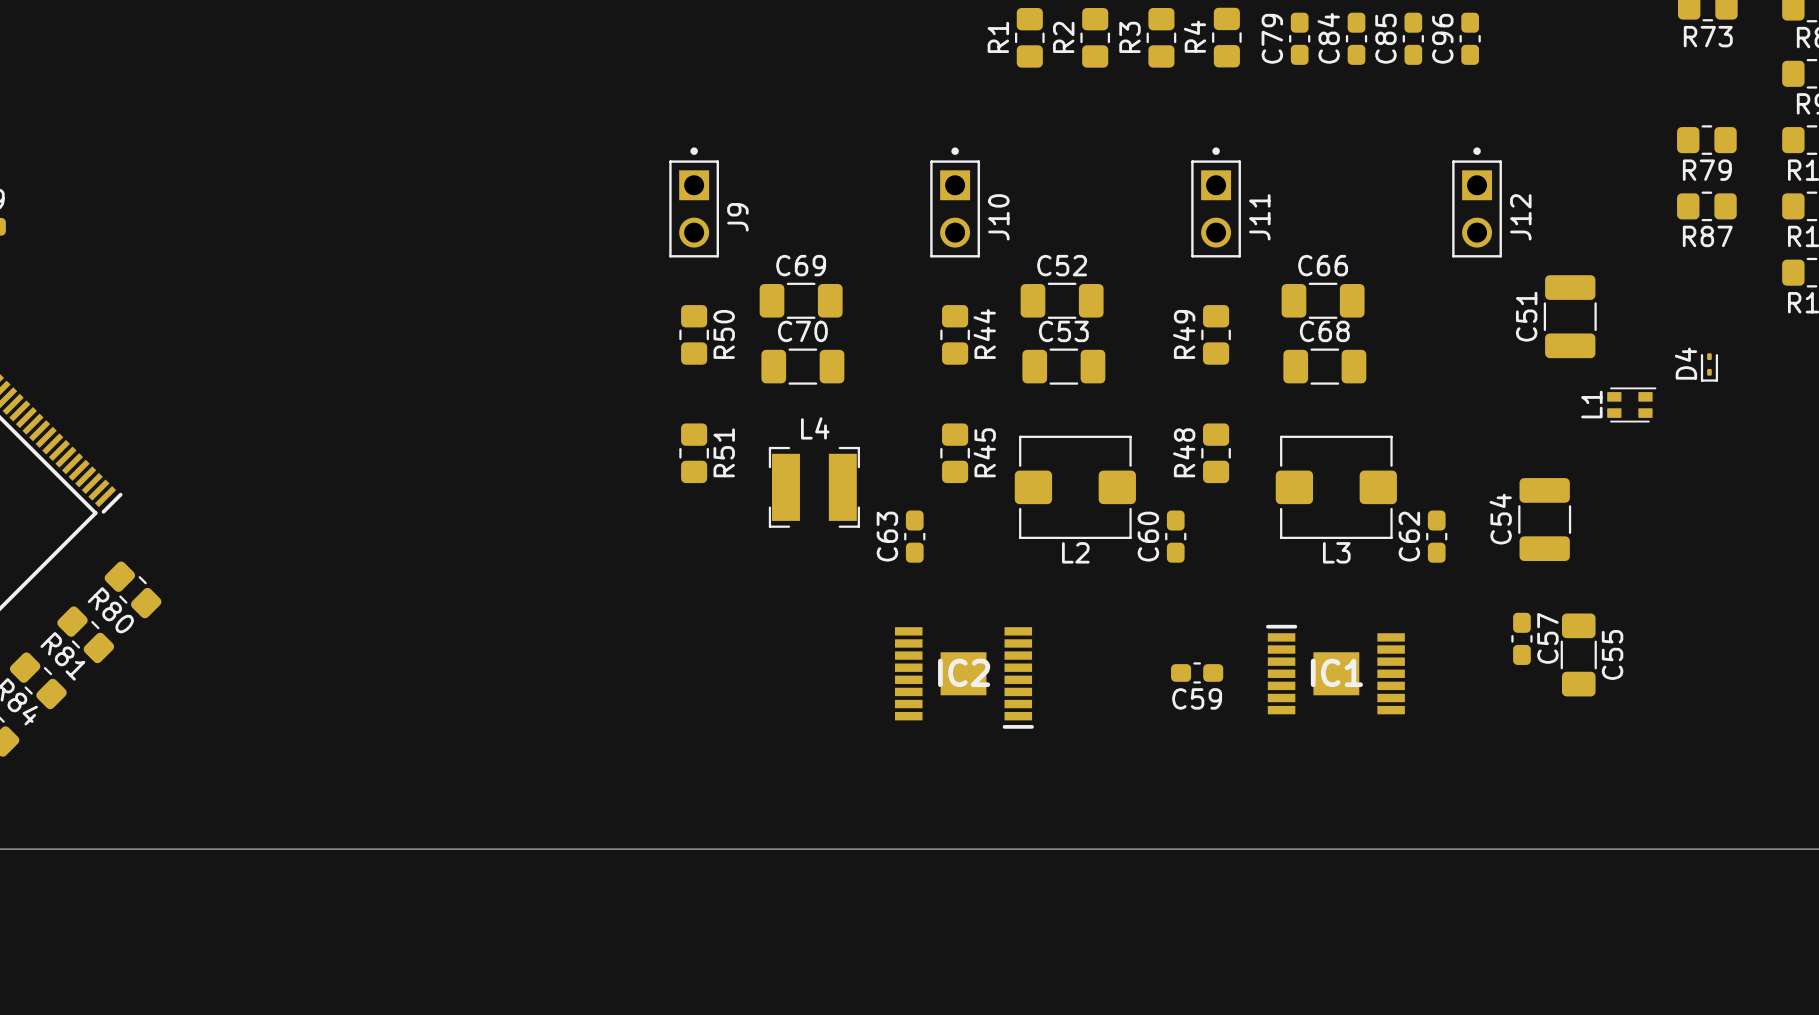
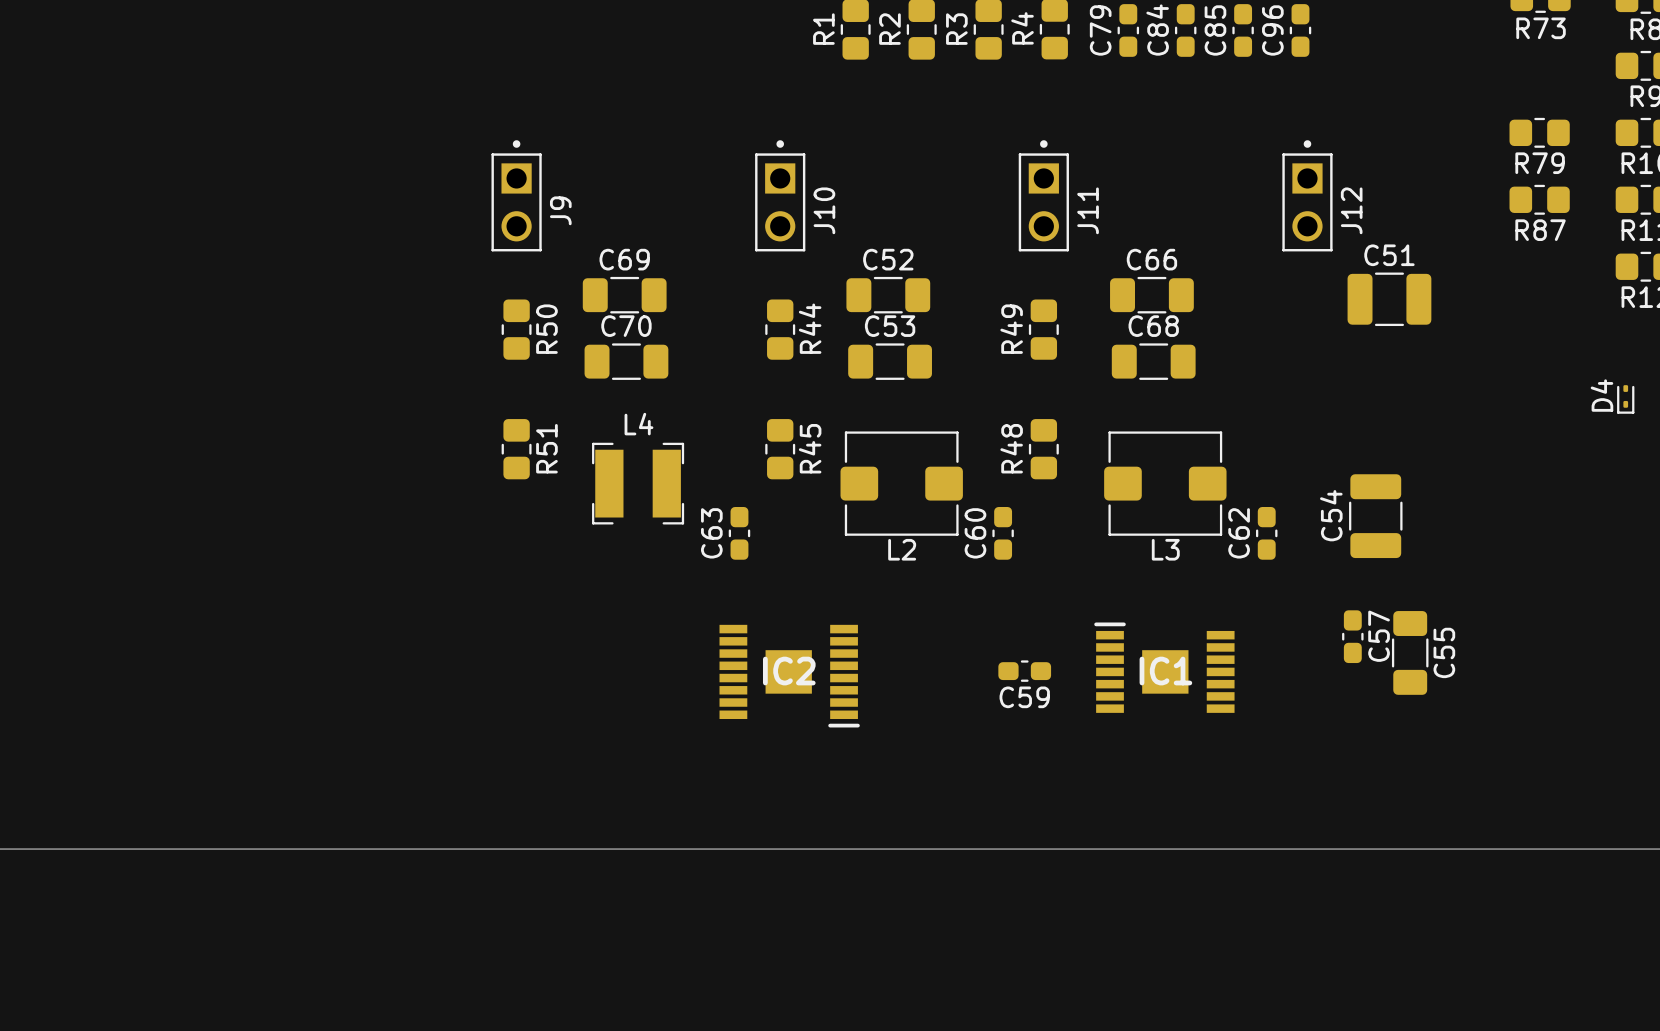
C51 rotation: 0° (1570, 316) -> 90° clockwise (1389, 299)
D4 position: (1709, 367) -> (1625, 399)
L1: (1631, 404) -> none

